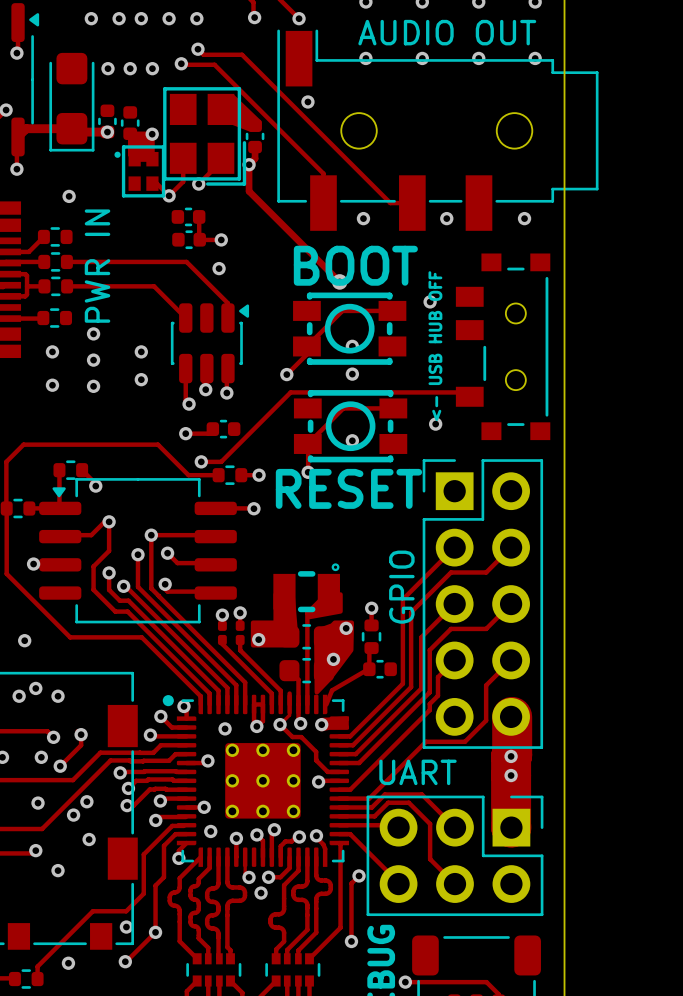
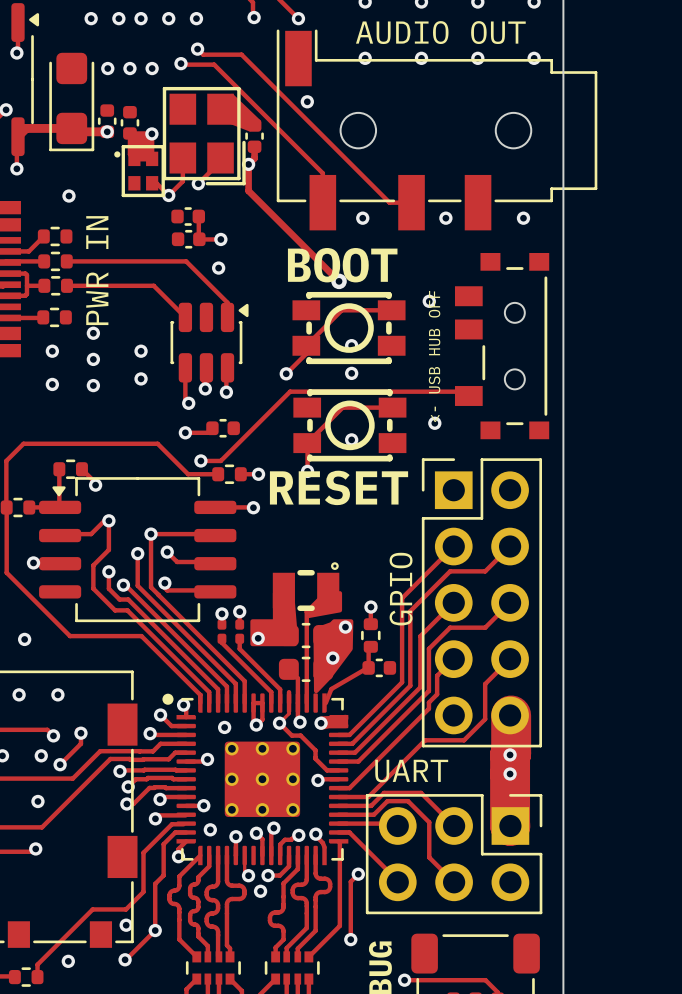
via: (35, 688) -> none
via: (86, 801) -> none
via: (73, 815) -> none
via: (89, 839) -> none
via: (58, 870) -> none

